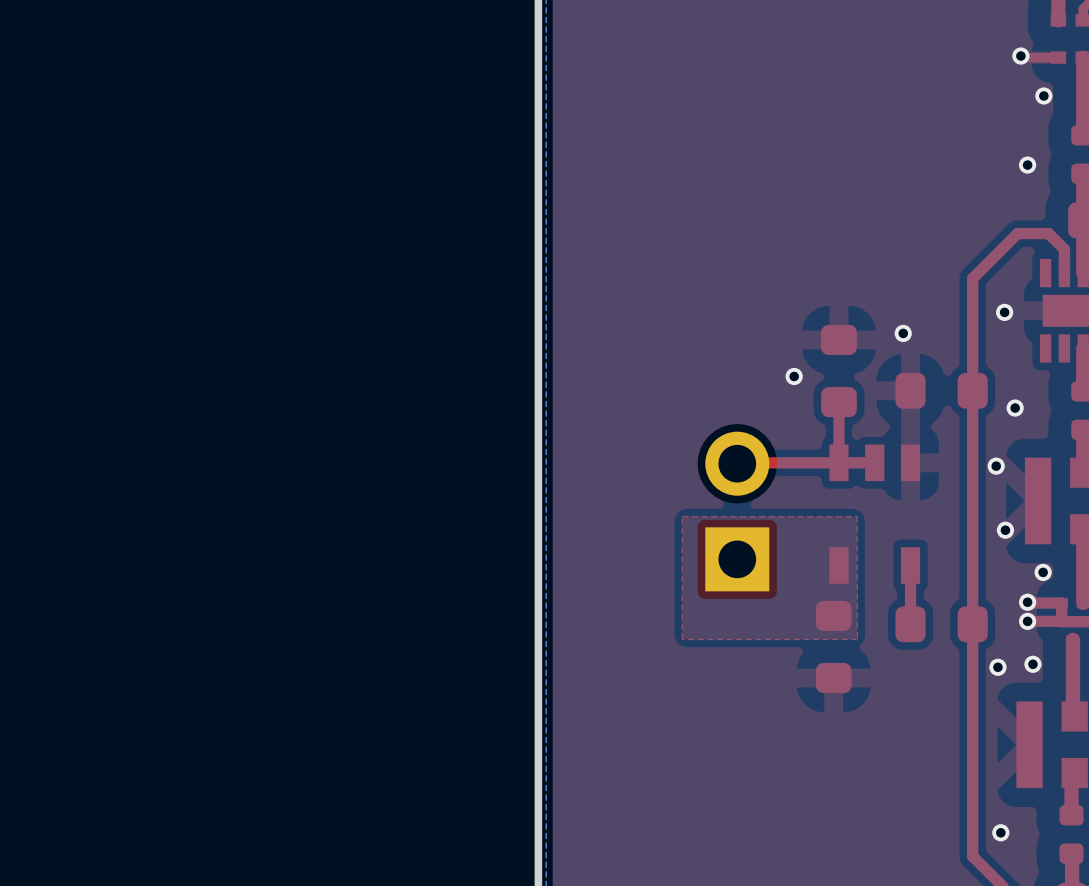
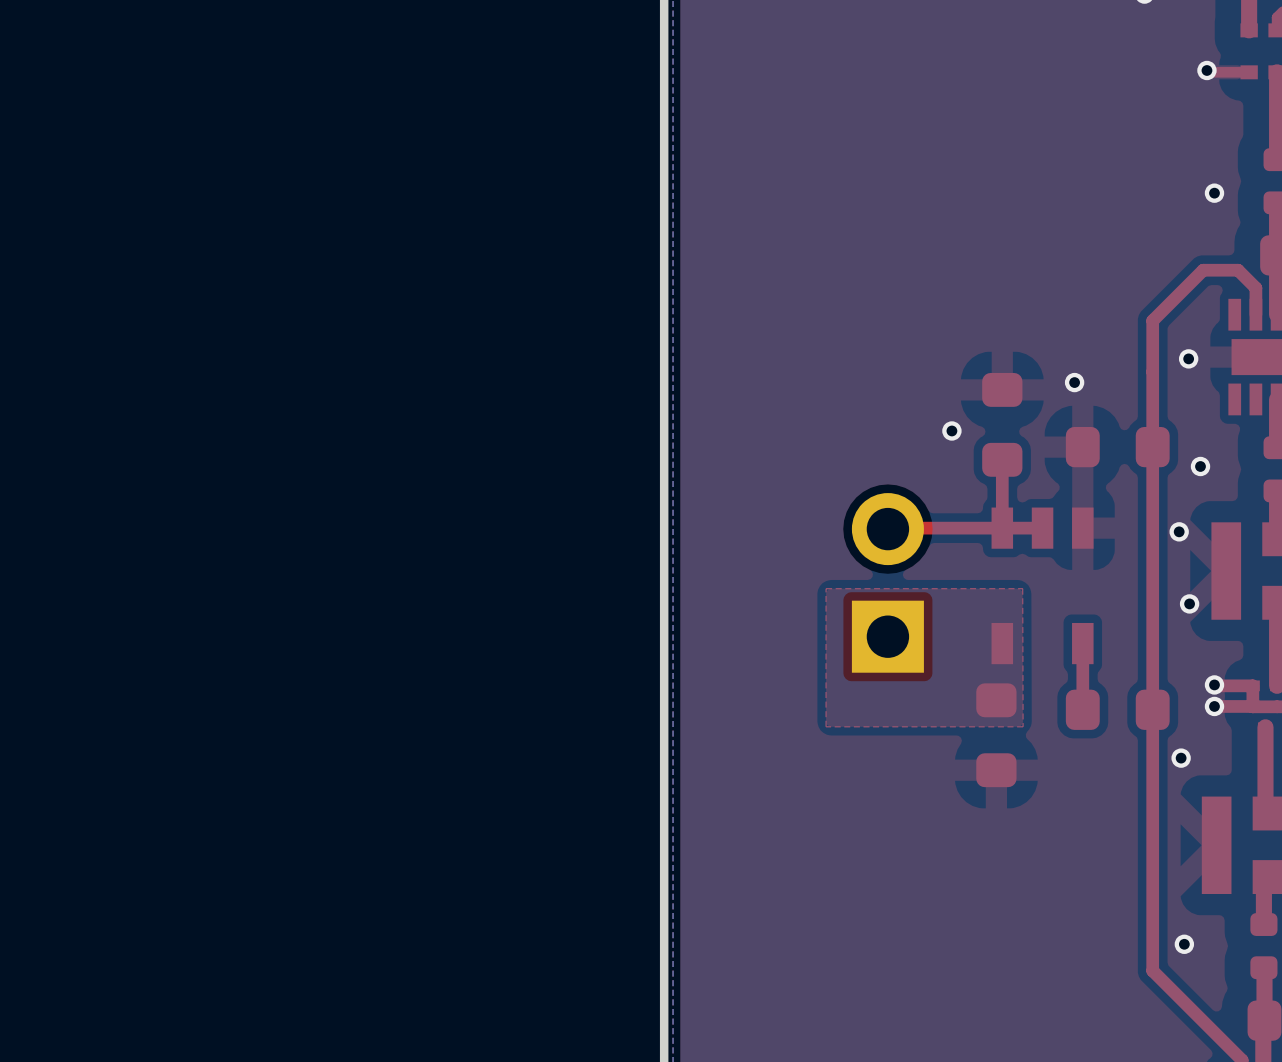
via: (1043, 95) -> none
via: (1043, 572) -> none
via: (1032, 664) -> none

